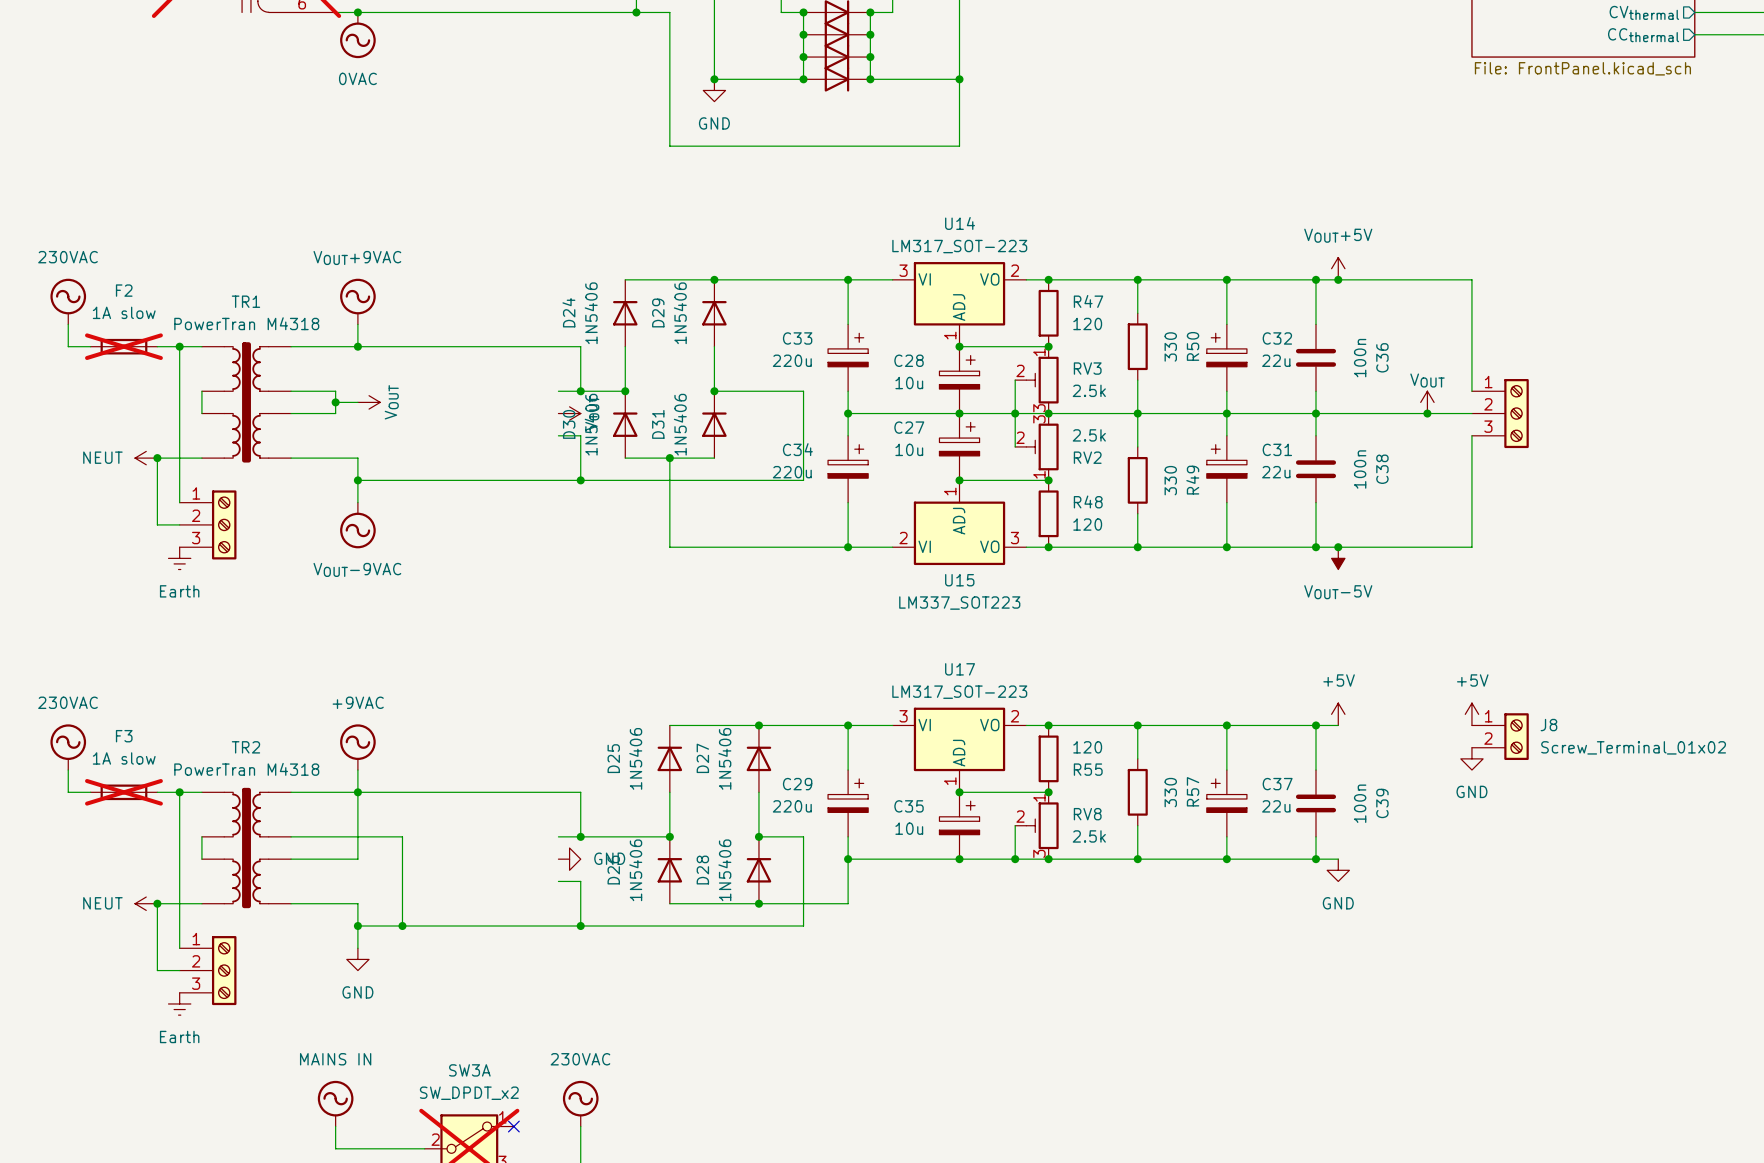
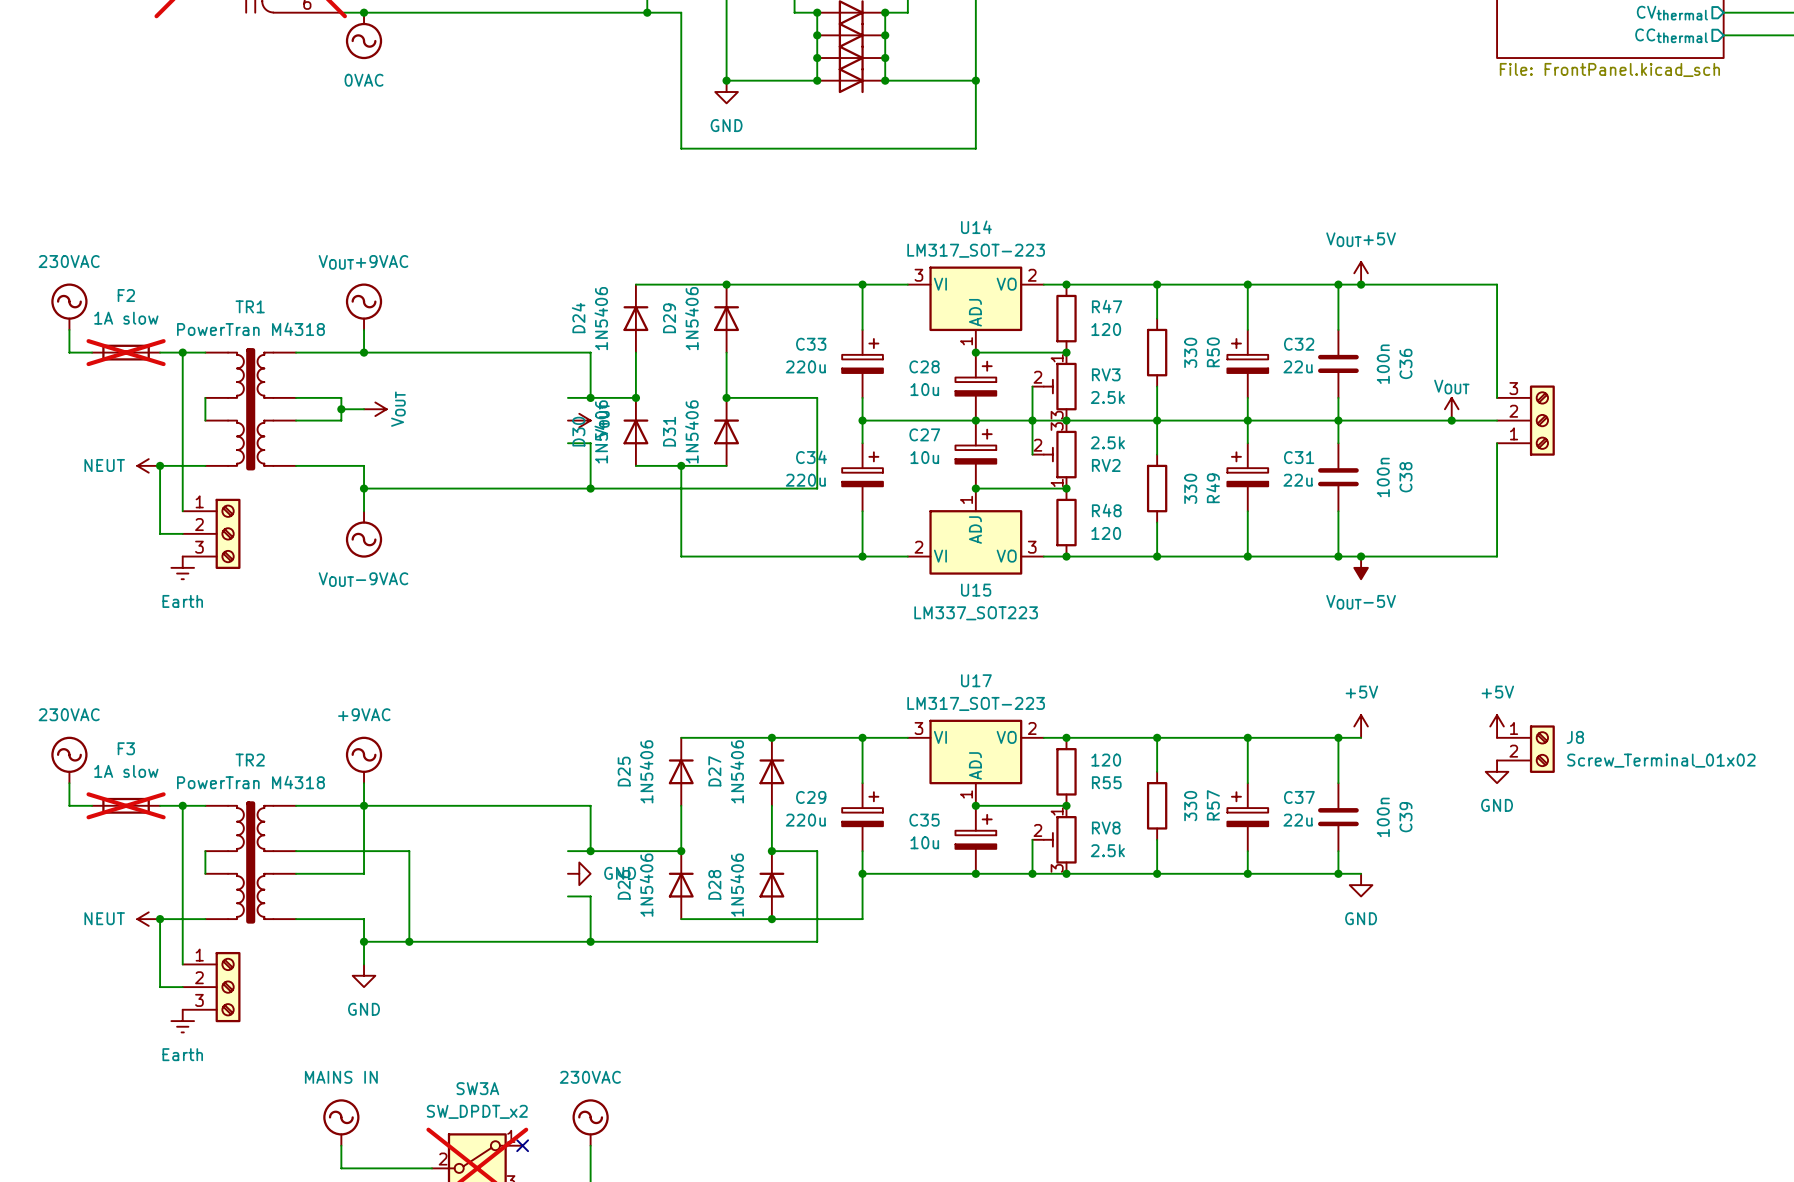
part flip: as is (1516, 413) -> up-down (1542, 420)

